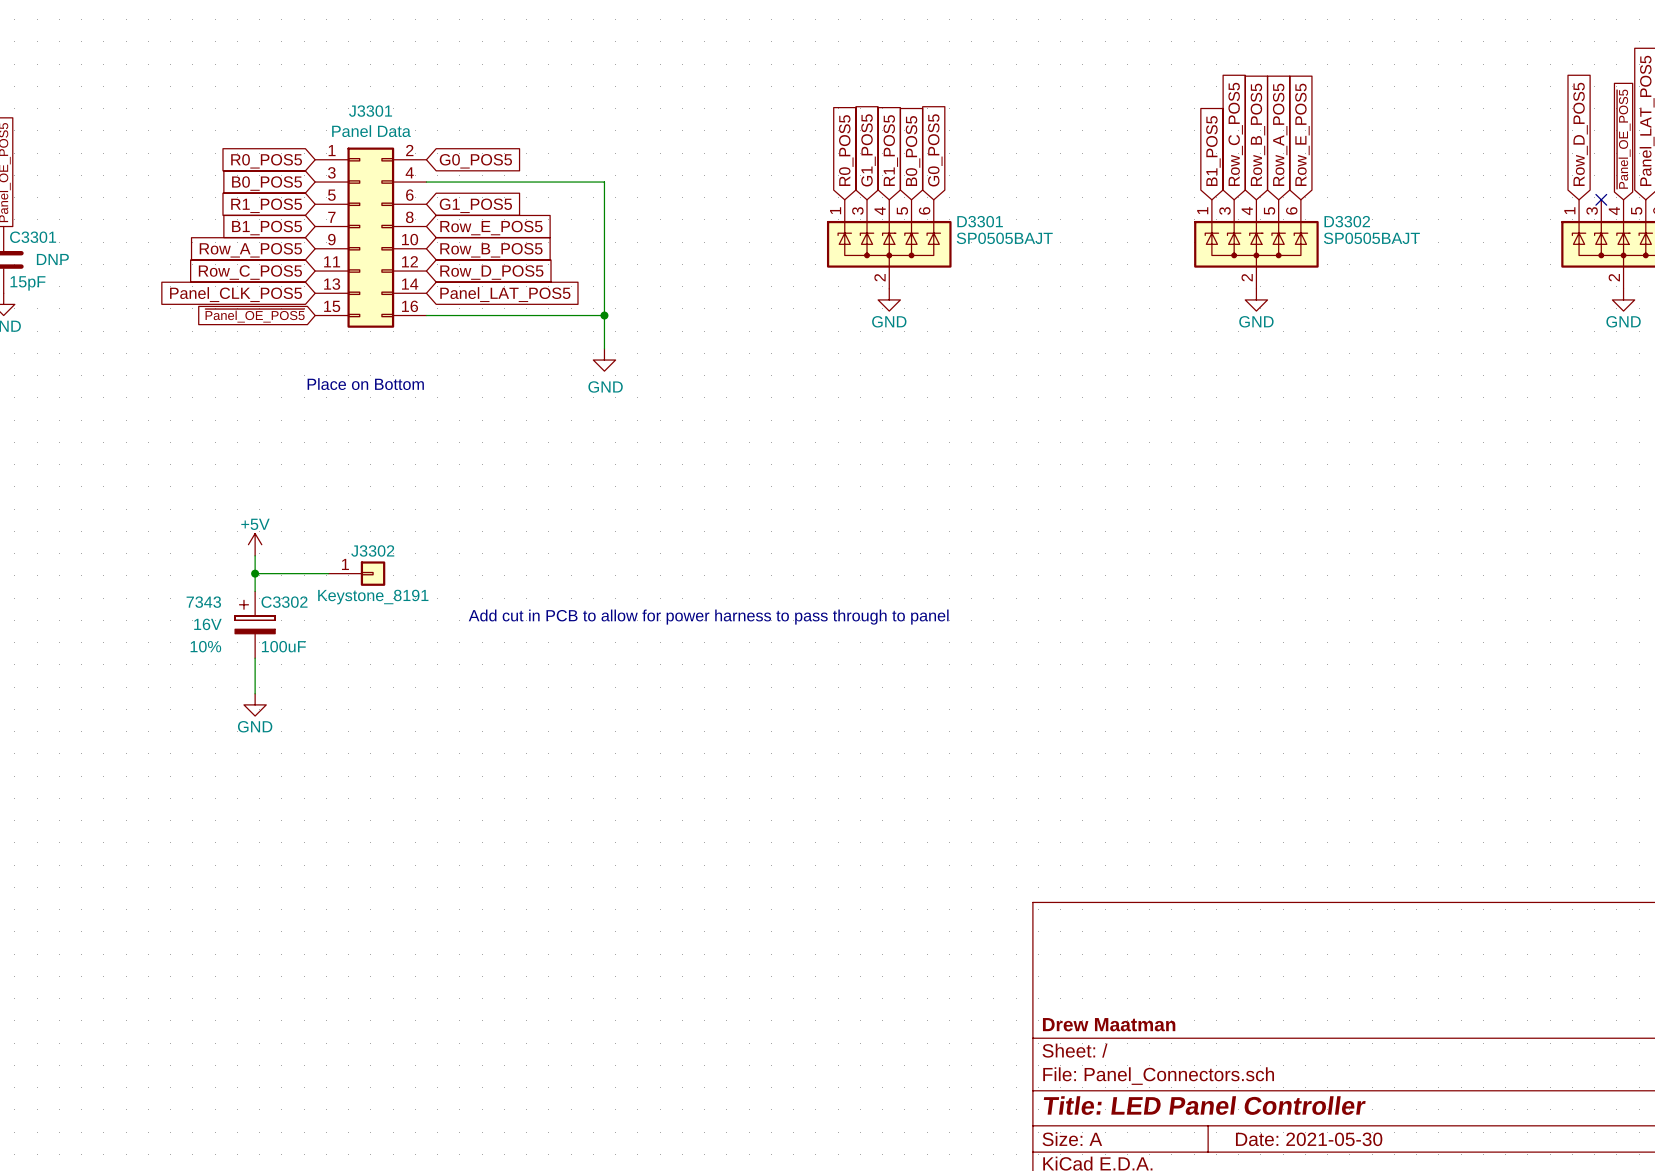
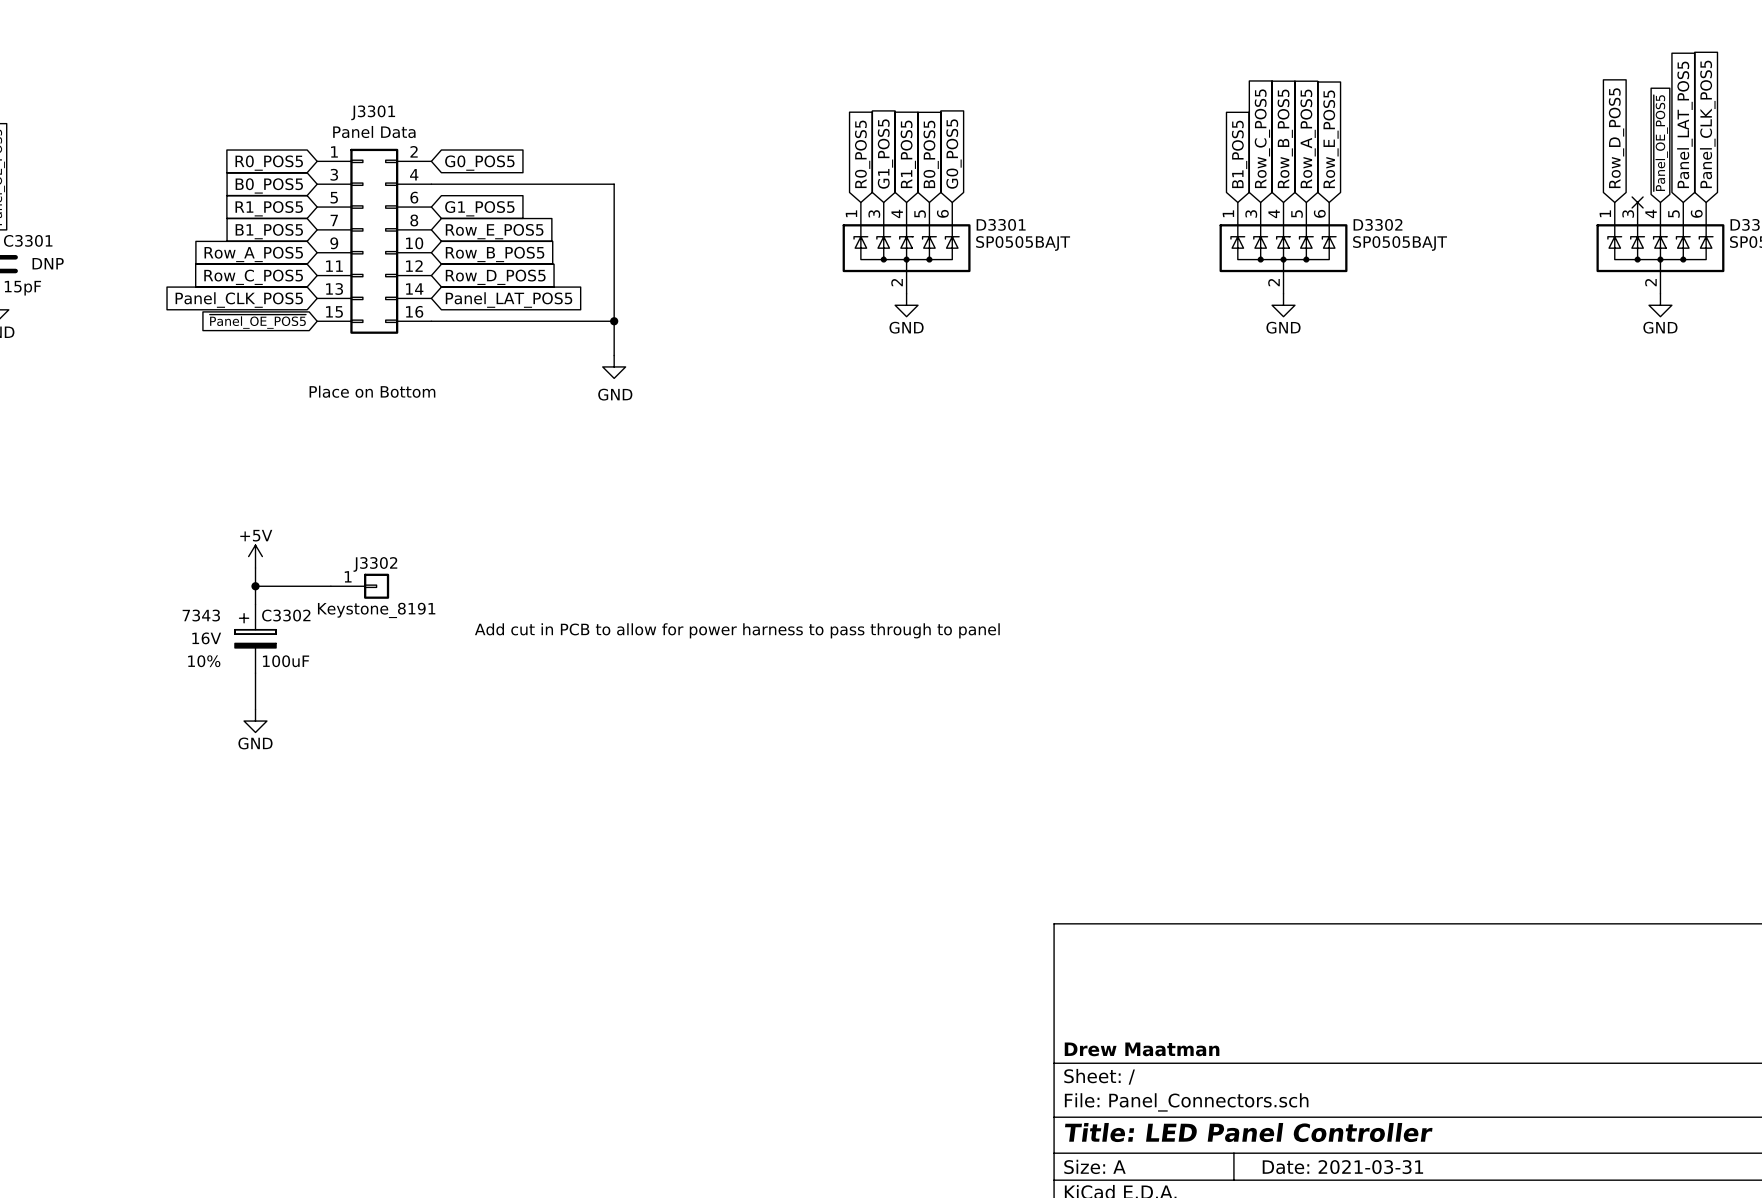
title block: Date: 2021-05-30 (1309, 1139) -> Date: 2021-03-31 (1342, 1167)

